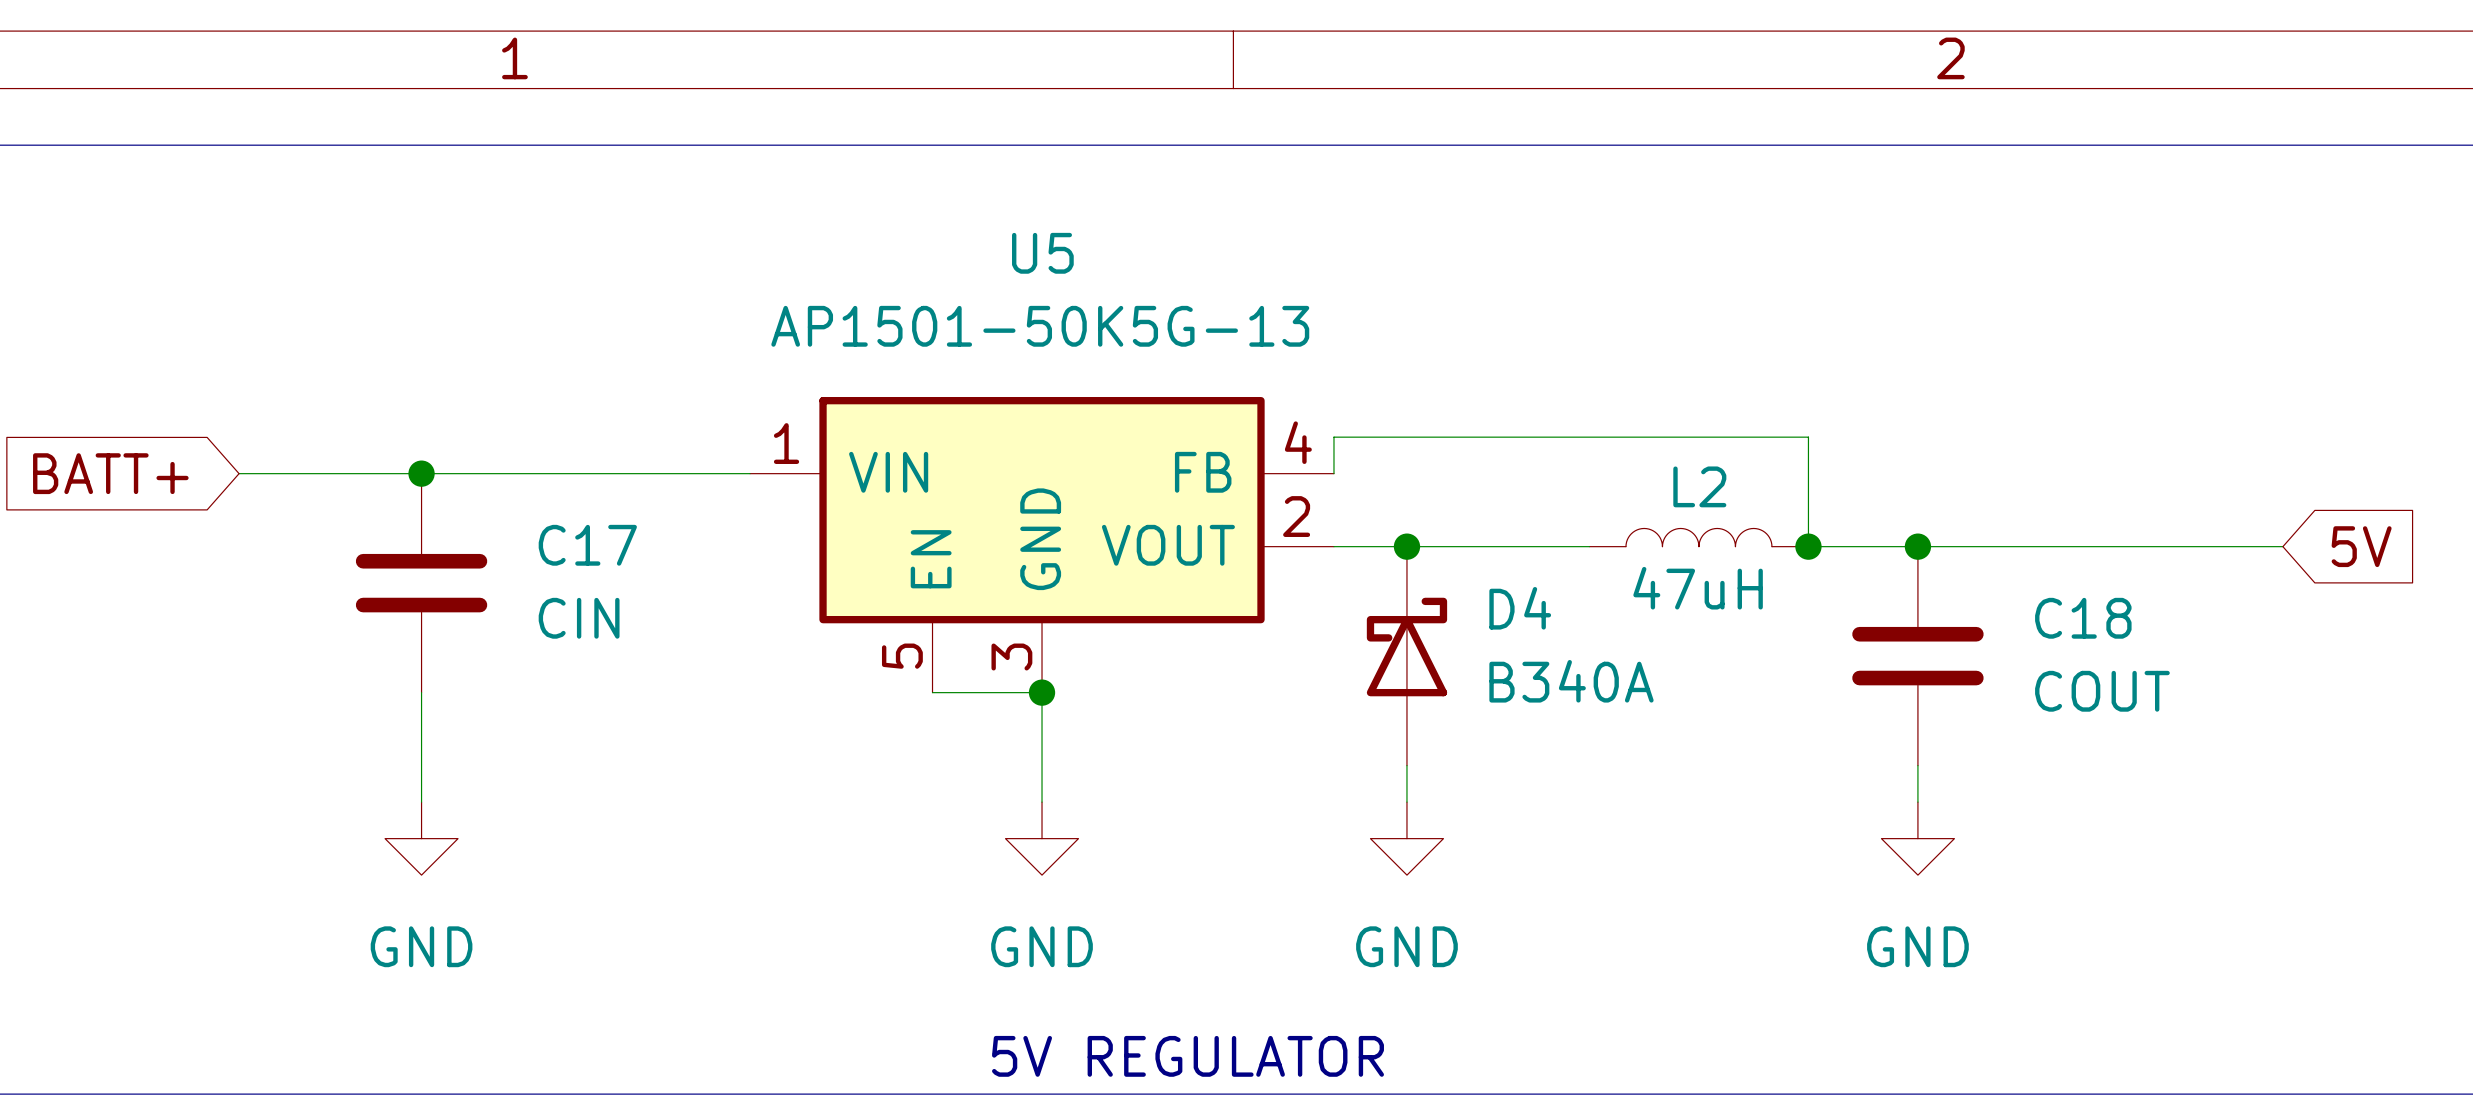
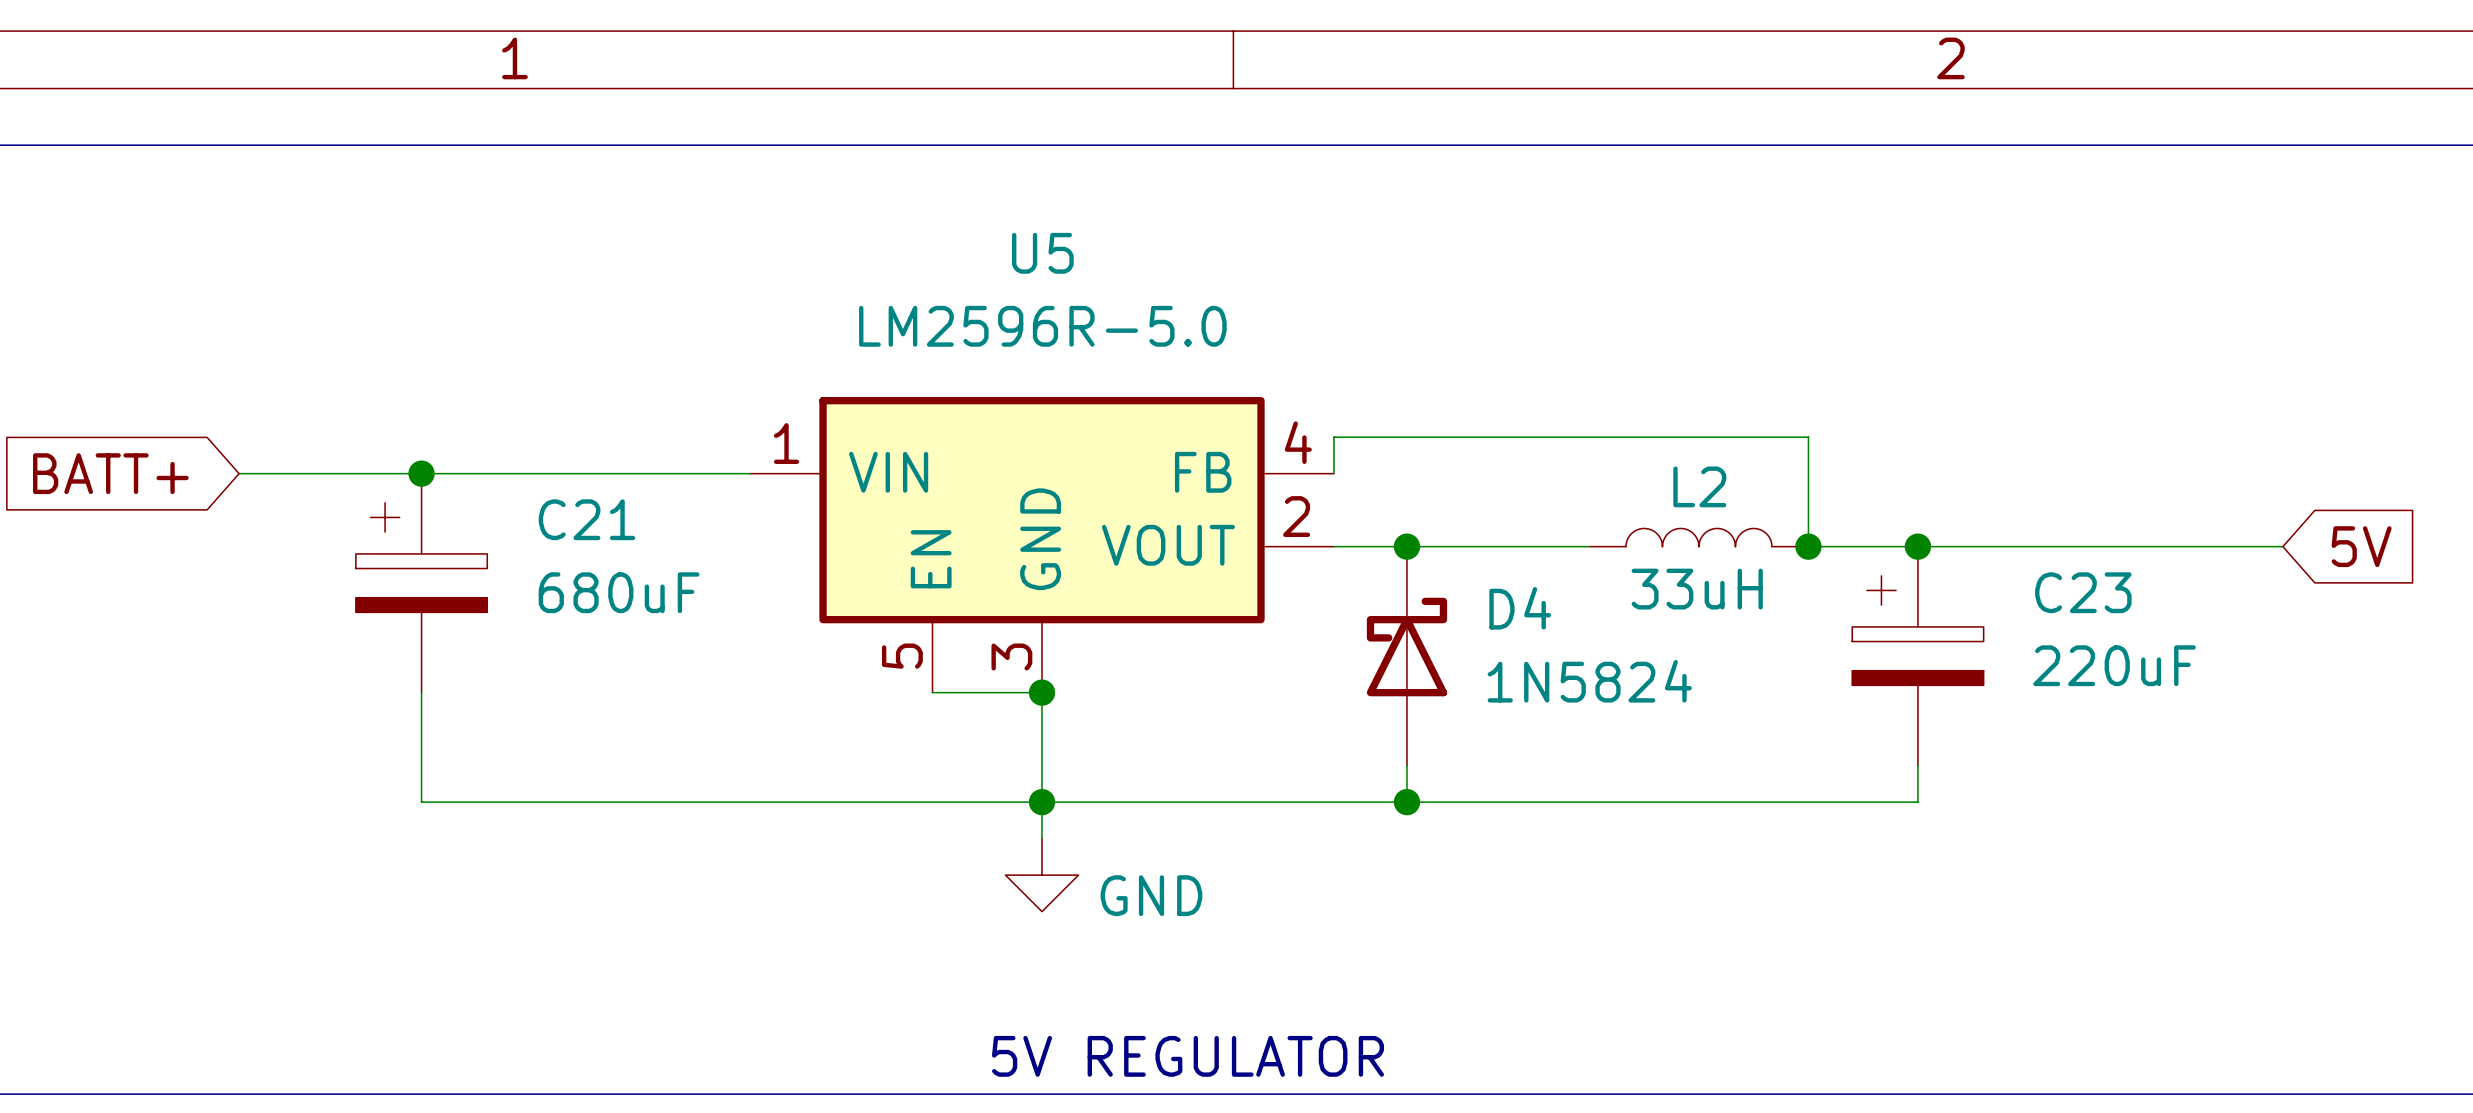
U5 value: AP1501-50K5G-13 (1040, 326) -> LM2596R-5.0 (1042, 326)
C17: CIN (421, 583) -> none
C21: none -> 680uF (421, 583)
L2 value: 47uH (1698, 588) -> 33uH (1697, 589)
C18: COUT (1917, 656) -> none
C23: none -> 220uF (1917, 656)
D4 value: B340A (1571, 681) -> 1N5824 (1589, 681)
wire: none -> (421, 802) (1917, 802)
junction: none -> (1042, 802)
junction: none -> (1406, 802)
power symbol: GND (421, 838) -> none
power symbol position: GND (1042, 838) -> GND (1042, 875)
power symbol: GND (1406, 838) -> none
power symbol: GND (1917, 838) -> none
power symbol text position: GND (1042, 946) -> GND (1151, 895)

